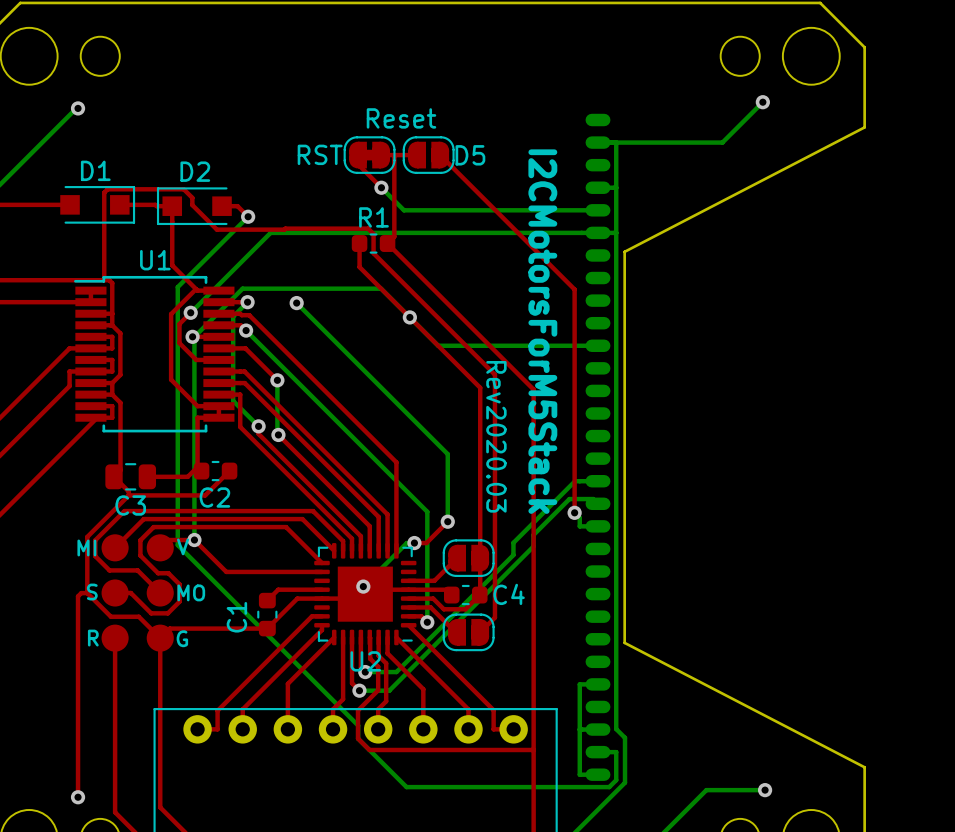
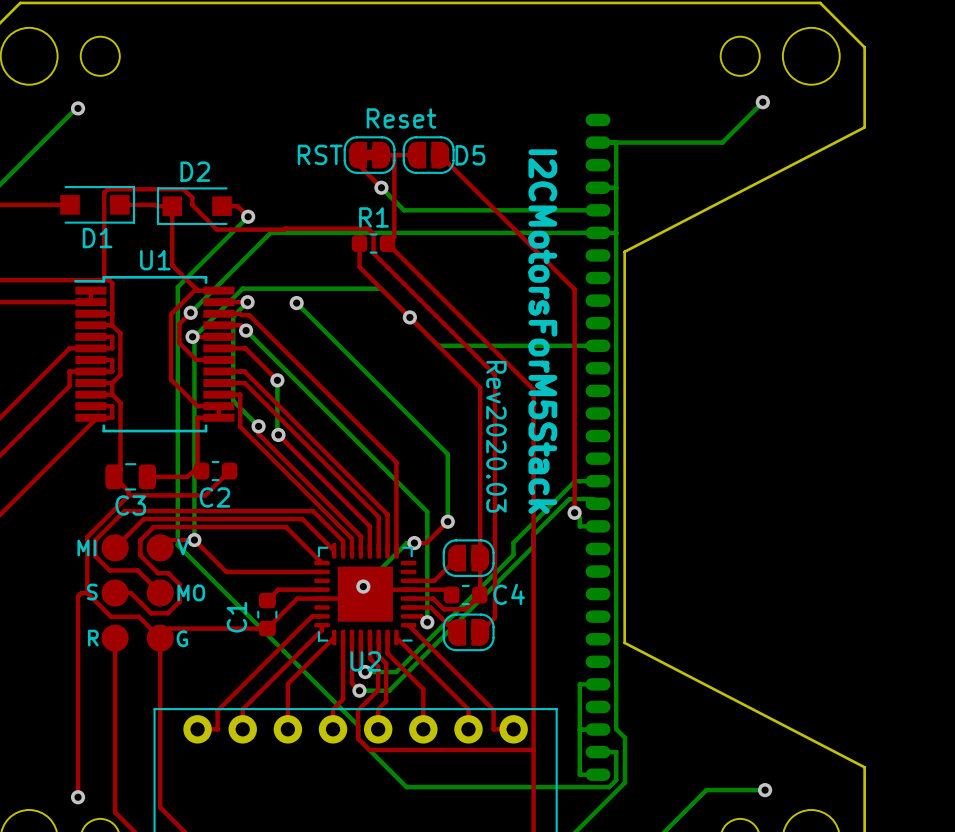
D1 name position: D1 (95, 170) -> D1 (97, 238)

